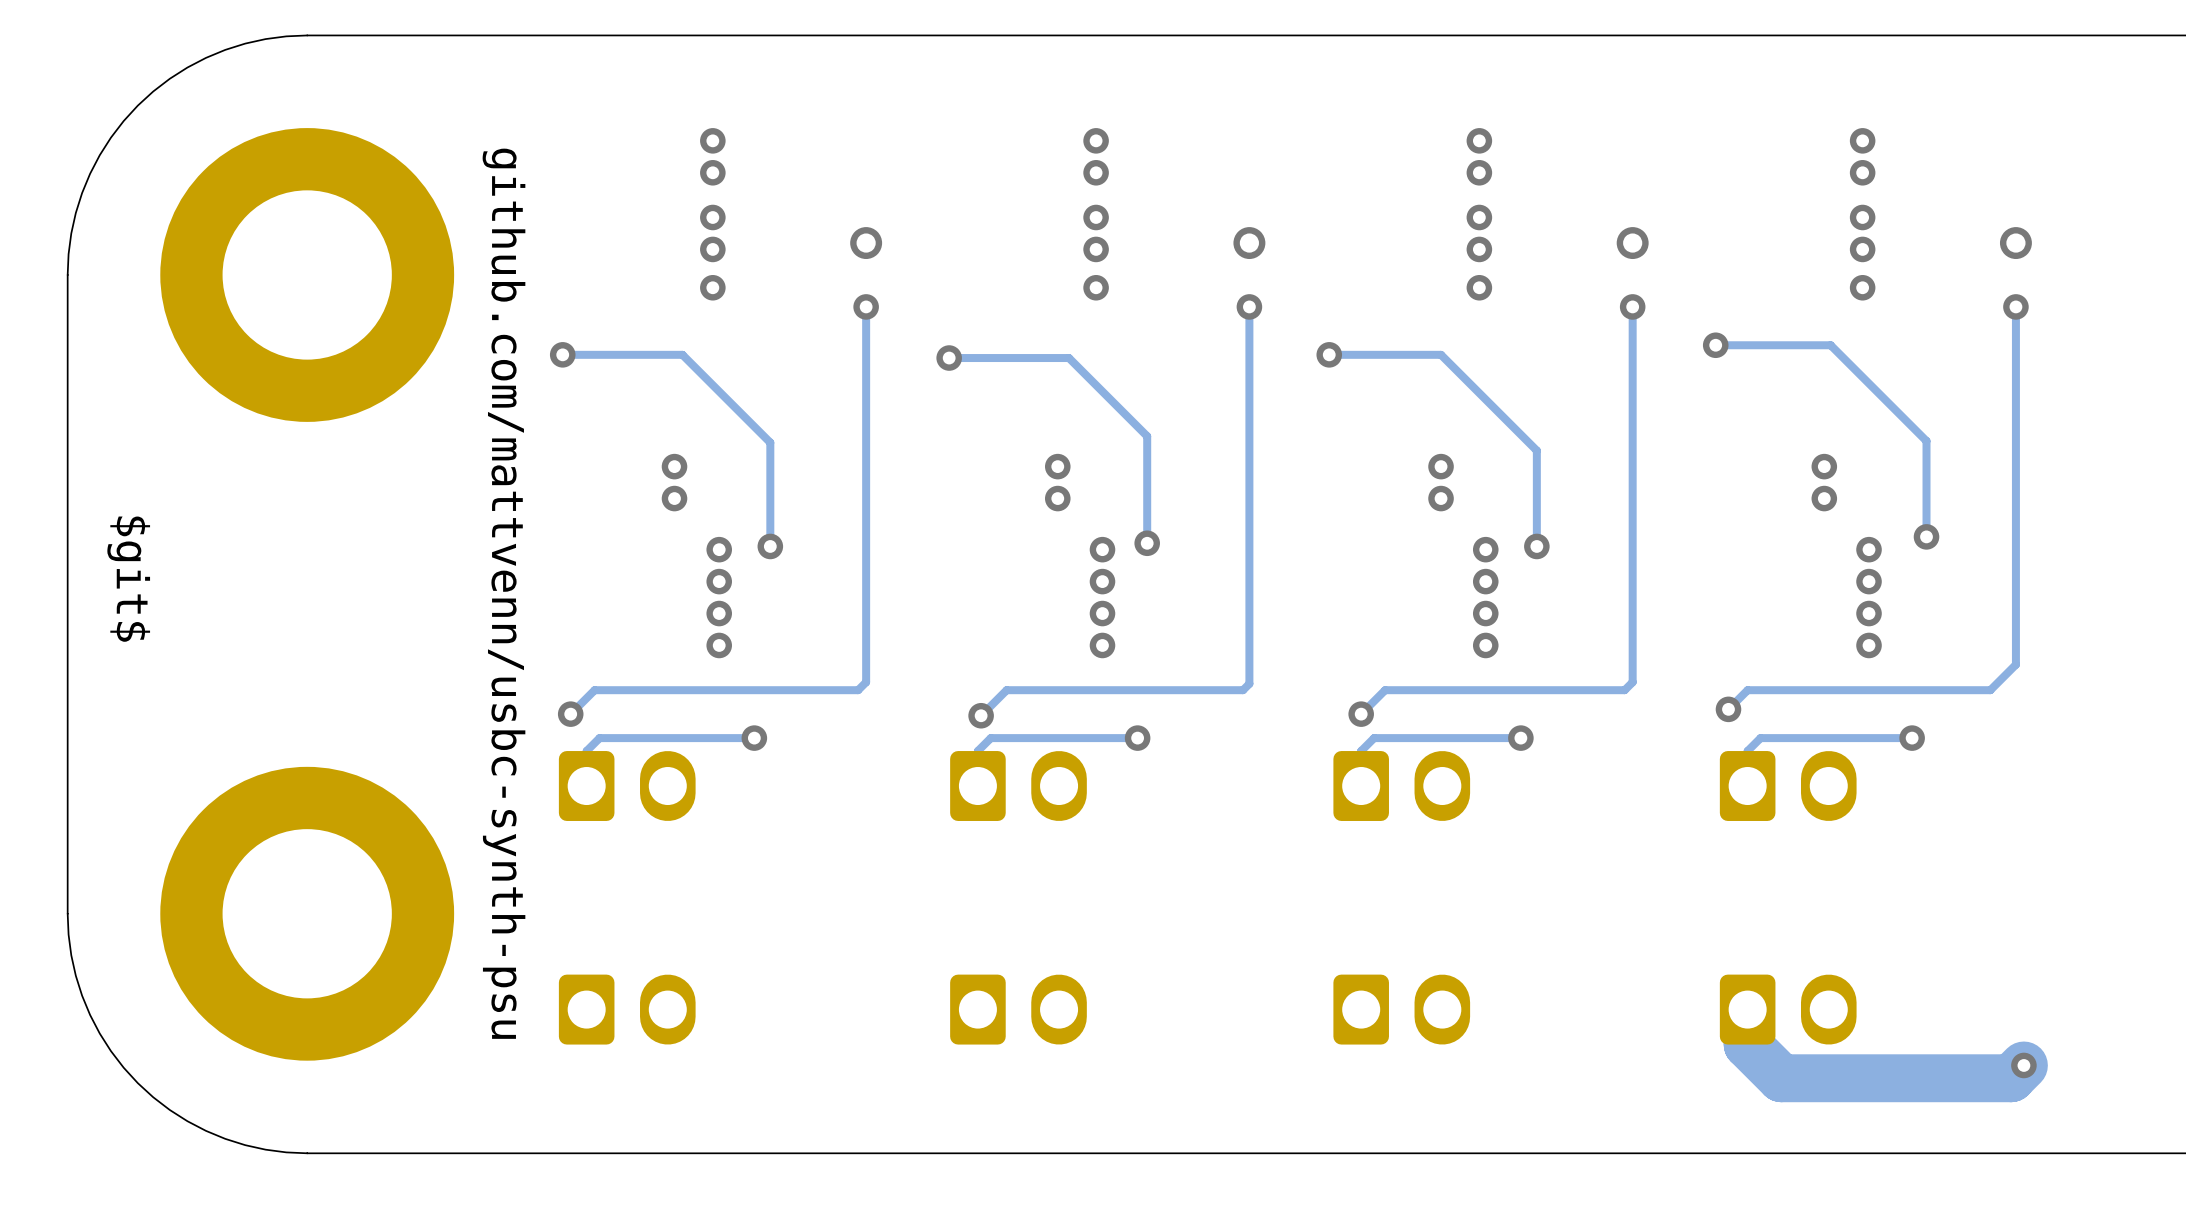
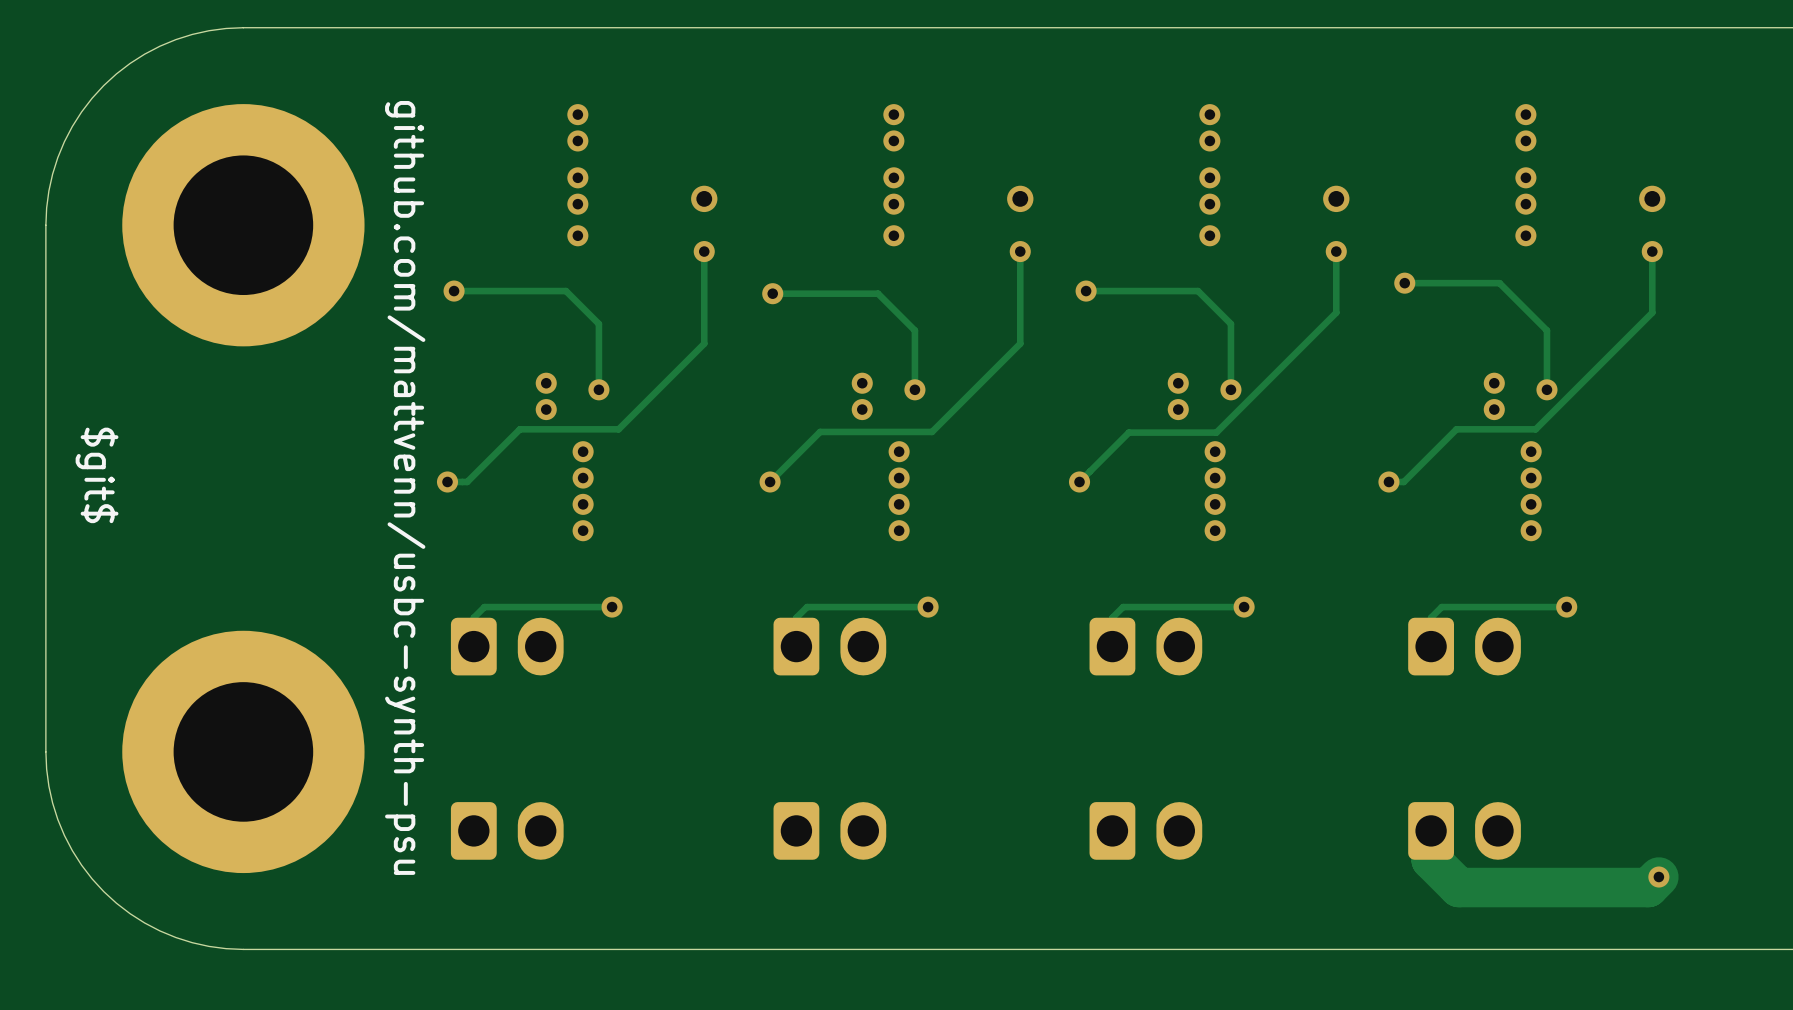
track: (682, 354) (770, 442) (770, 546) -> (552, 291) (566, 291) (598, 323) (598, 389)
track: (1441, 354) (1536, 450) (1536, 546) -> (1178, 291) (1198, 291) (1230, 323) (1230, 389)
track: (1068, 358) (1147, 436) (1147, 543) -> (871, 293) (878, 293) (914, 330) (914, 389)
track: (1632, 381) (1632, 682) (1624, 690) (1385, 690) (1361, 714) -> (1336, 312) (1216, 432) (1128, 432) (1079, 481)
track: (2015, 381) (2015, 664) (1990, 690) (1747, 690) (1728, 709) -> (1652, 312) (1535, 429) (1456, 429) (1403, 481) (1388, 481)
track: (1888, 402) (1926, 441) (1926, 536) -> (1546, 330) (1546, 389)
track: (866, 418) (866, 682) (858, 690) (594, 690) (570, 714) -> (704, 343) (618, 429) (519, 429) (467, 481) (447, 481)
track: (1249, 418) (1249, 683) (1243, 690) (1006, 690) (981, 715) -> (1020, 343) (932, 431) (820, 431) (770, 481)
via position: (1926, 536) -> (1546, 389)
via position: (1147, 543) -> (914, 389)
via position: (770, 546) -> (598, 389)
via position: (1536, 546) -> (1230, 389)
via: none -> (447, 481)
via: none -> (770, 481)
via: none -> (1079, 481)
via: none -> (1388, 481)
via: (1728, 709) -> none
via: (570, 714) -> none
via: (1361, 714) -> none
via: (981, 715) -> none

